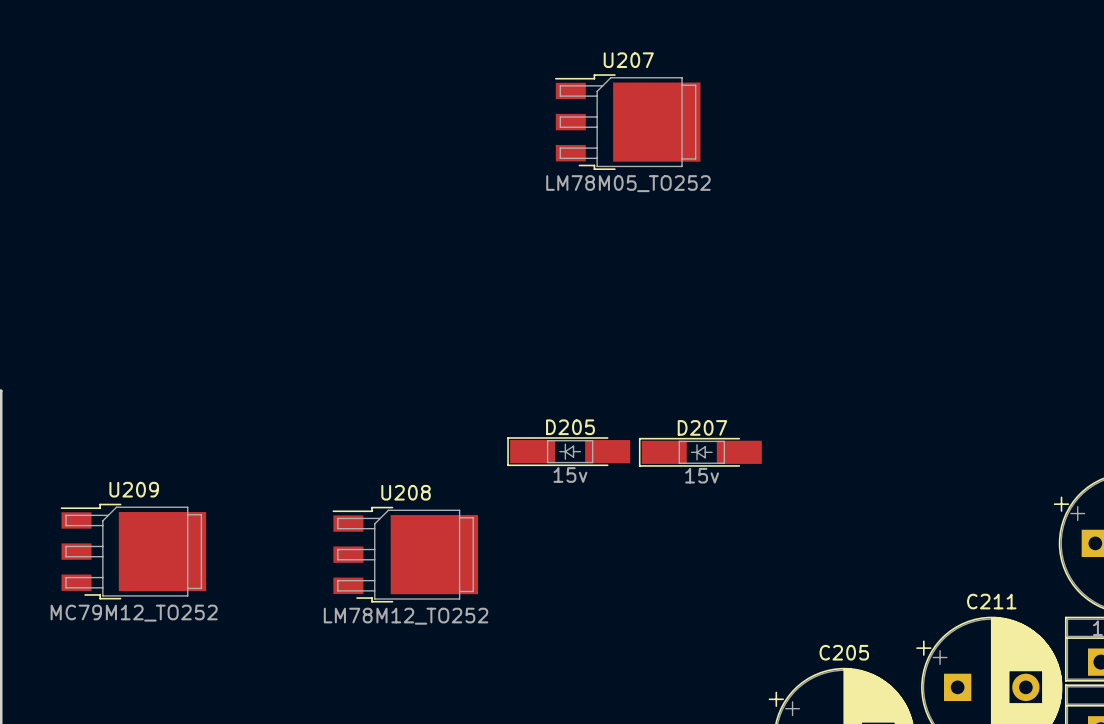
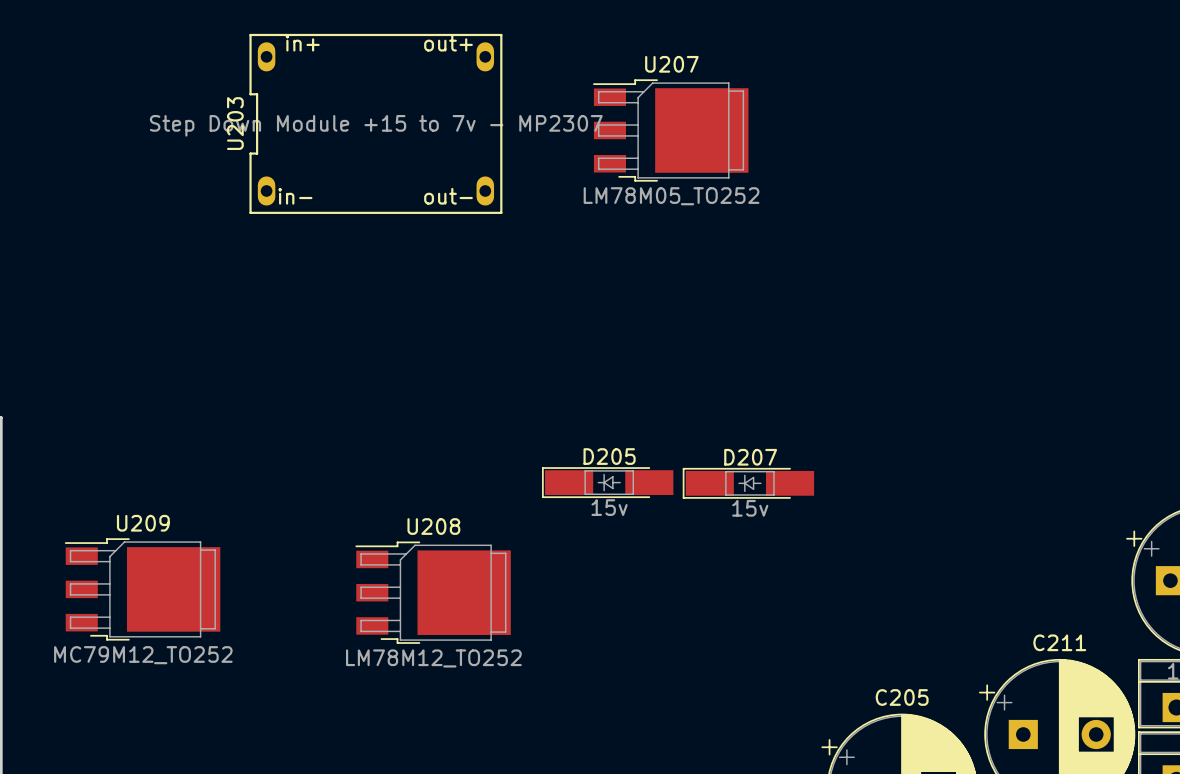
U203: none -> Step Down Module +15 to 7v - MP2307 (375, 123)

